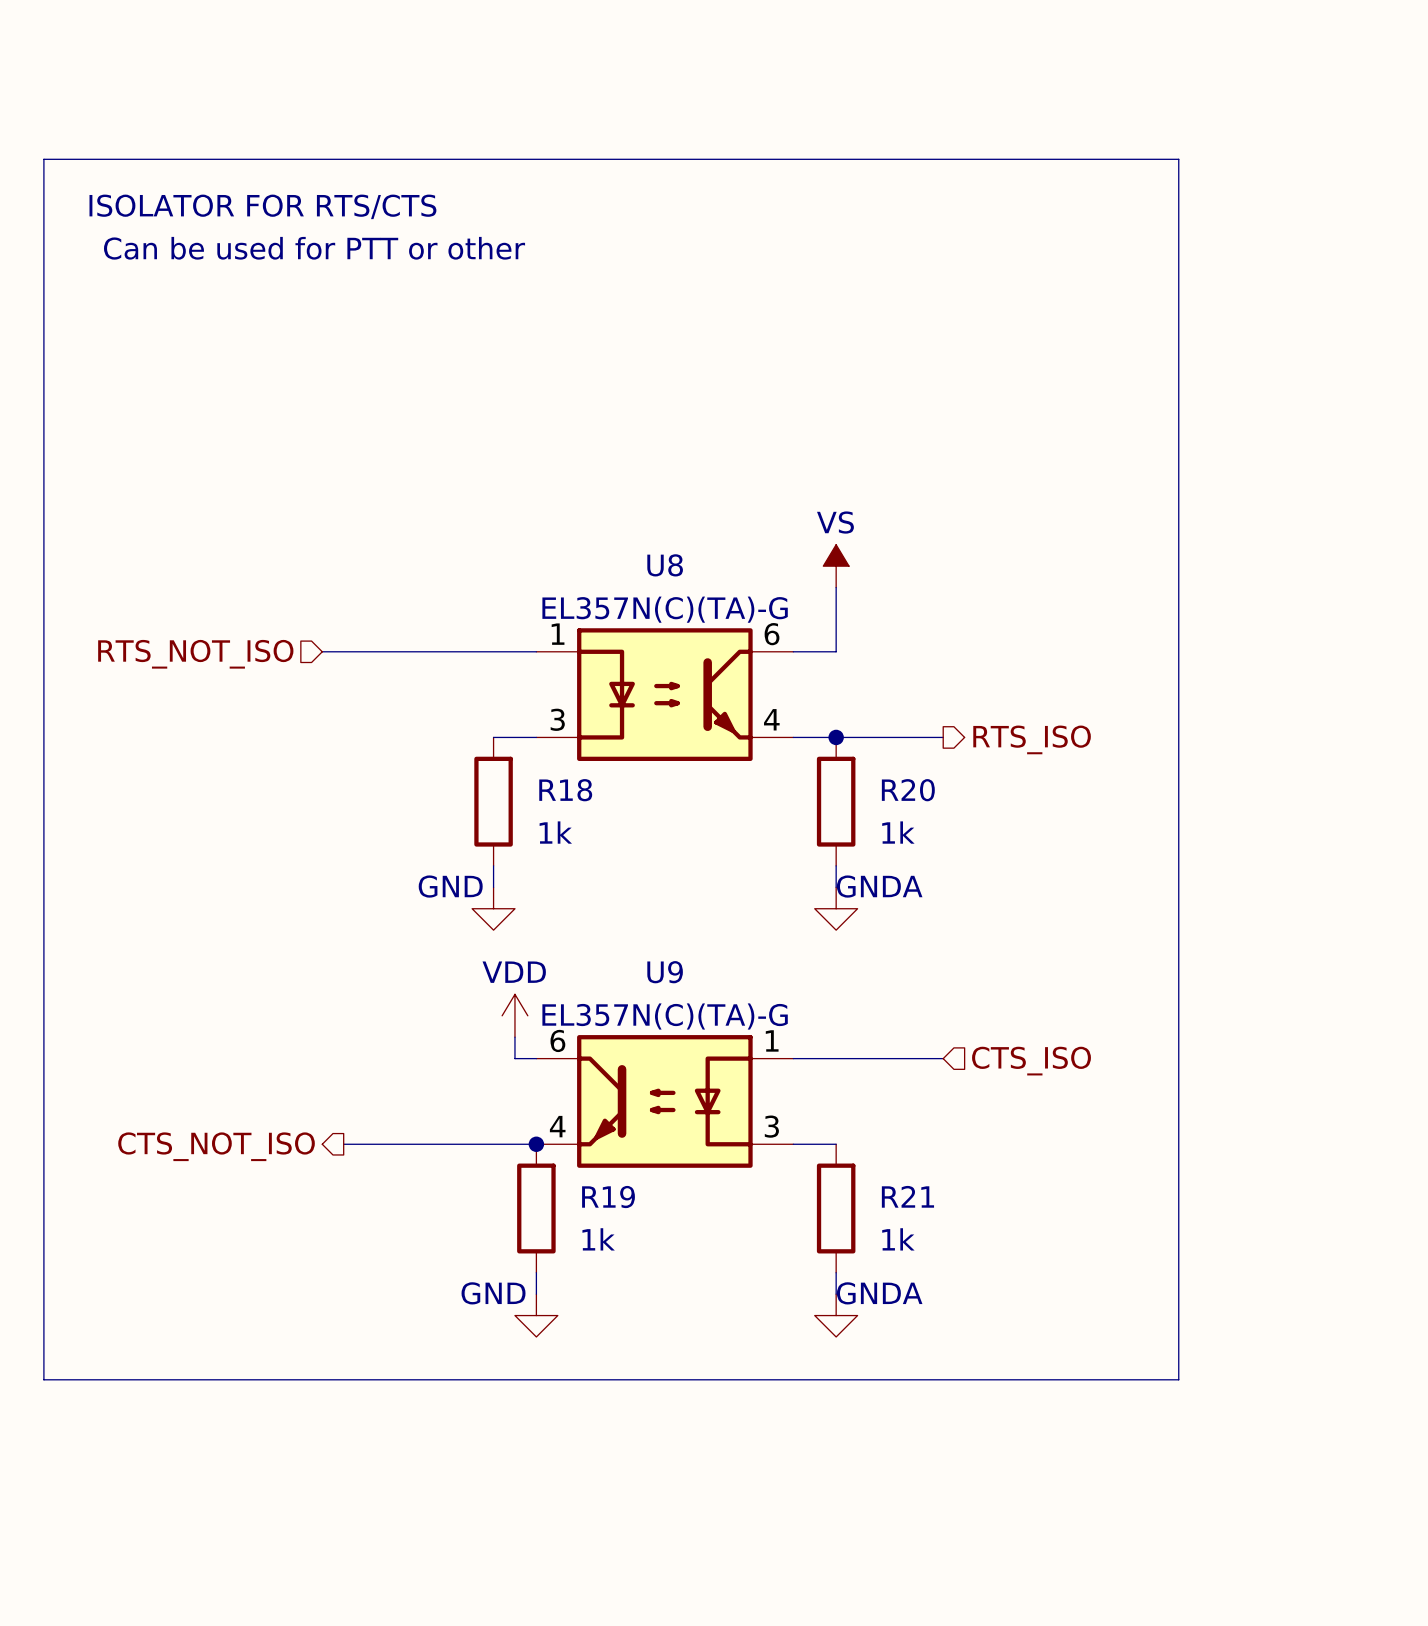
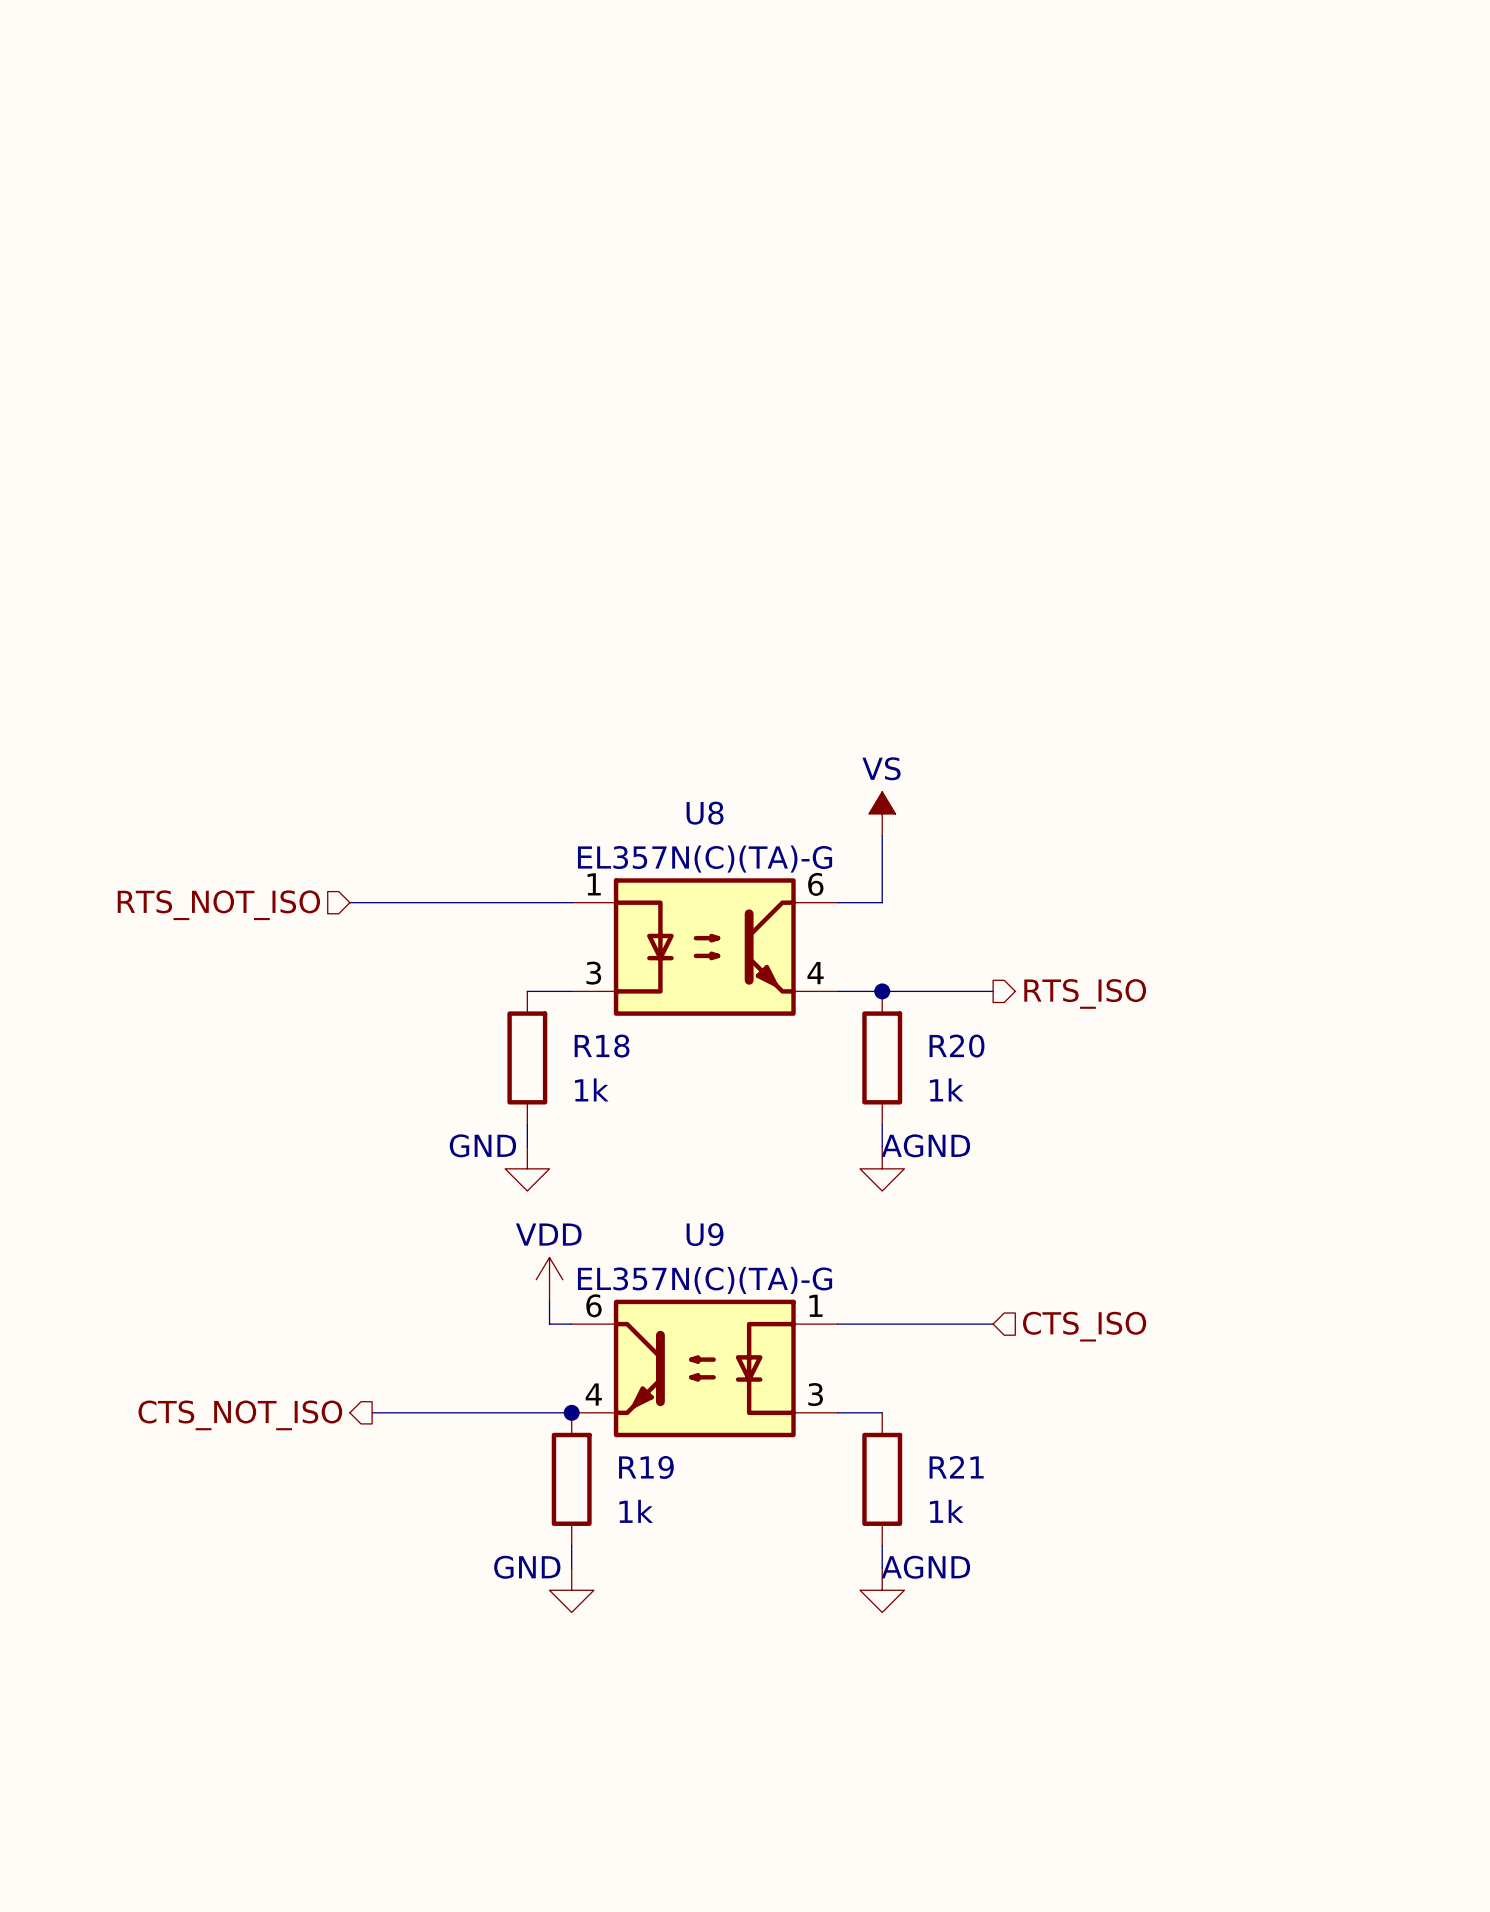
line: (43, 159) (1178, 159) (1178, 1379) (43, 1379) (43, 159) -> none
text: ISOLATOR FOR RTS/CTS (262, 206) -> none
text: Can be used for PTT or other (314, 248) -> none
power symbol: GNDA (836, 908) -> AGND (882, 1168)
power symbol: GNDA (836, 1315) -> AGND (882, 1590)

